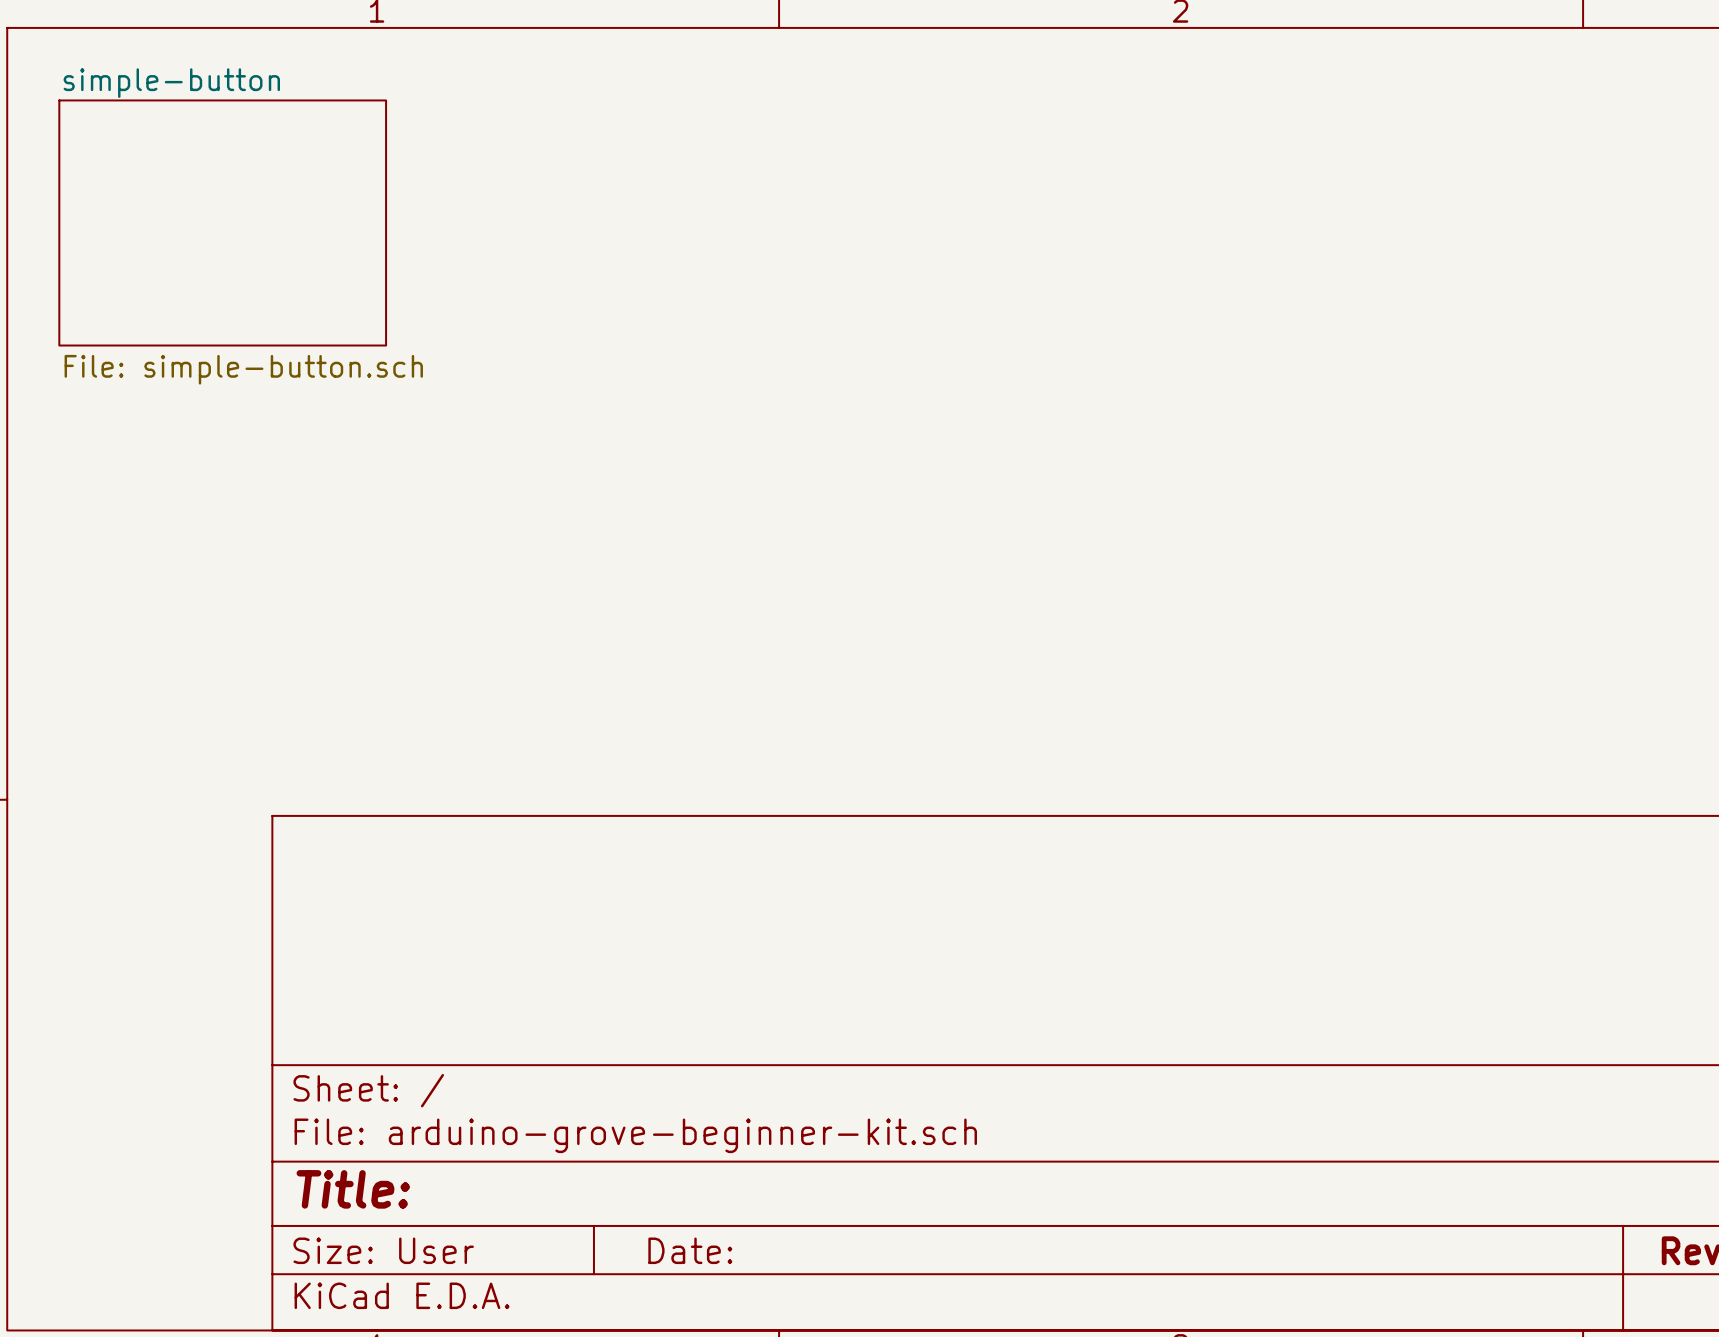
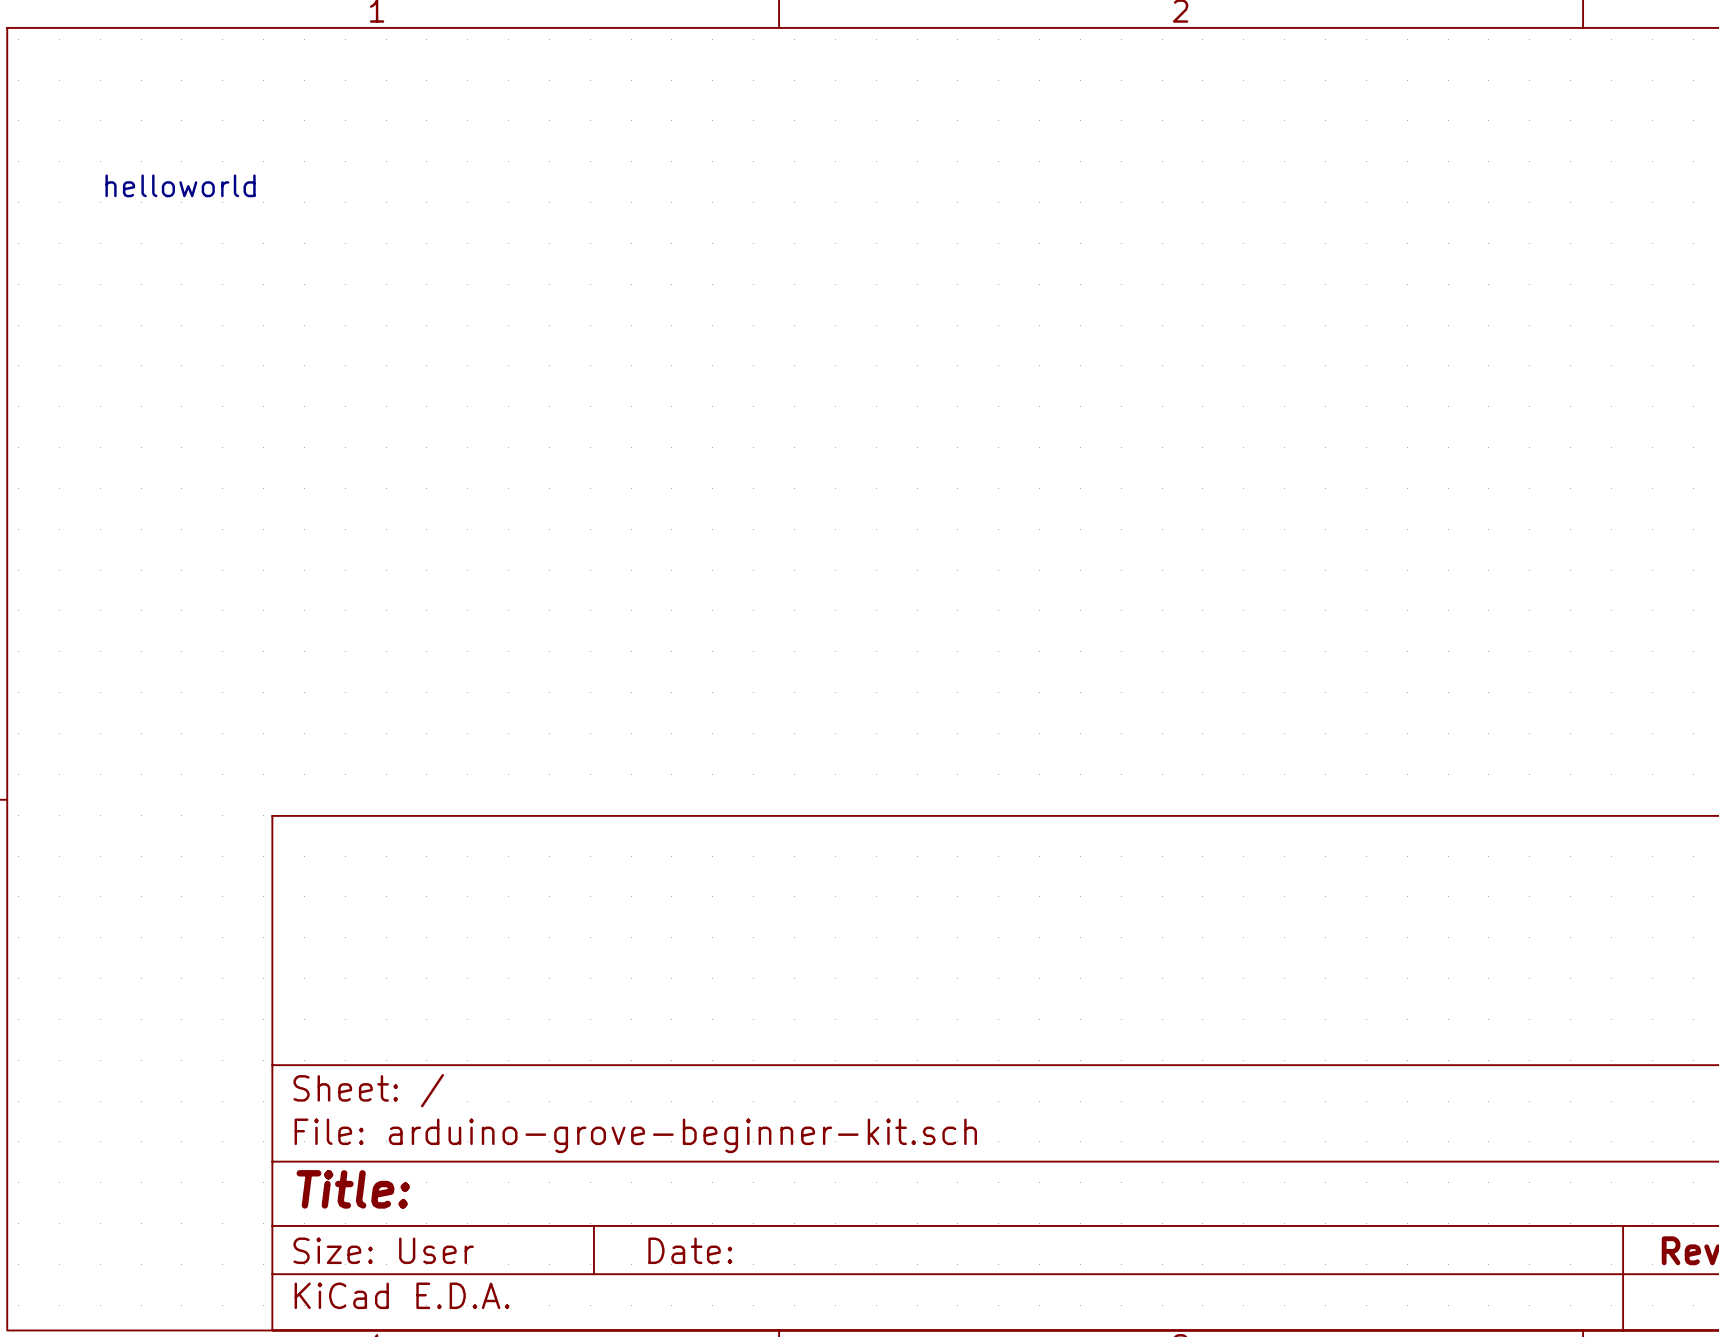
text: none -> helloworld (180, 185)
sheet simple-button: File: simple-button.sch (222, 222) -> none

